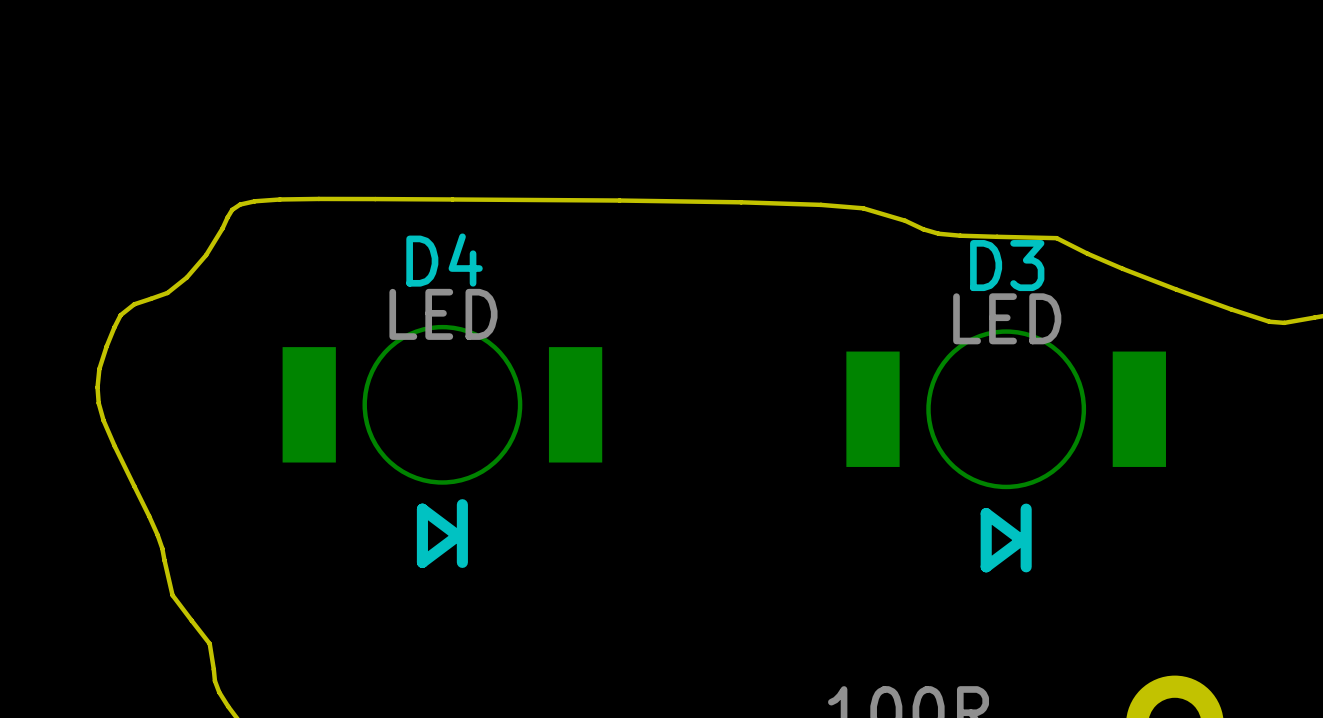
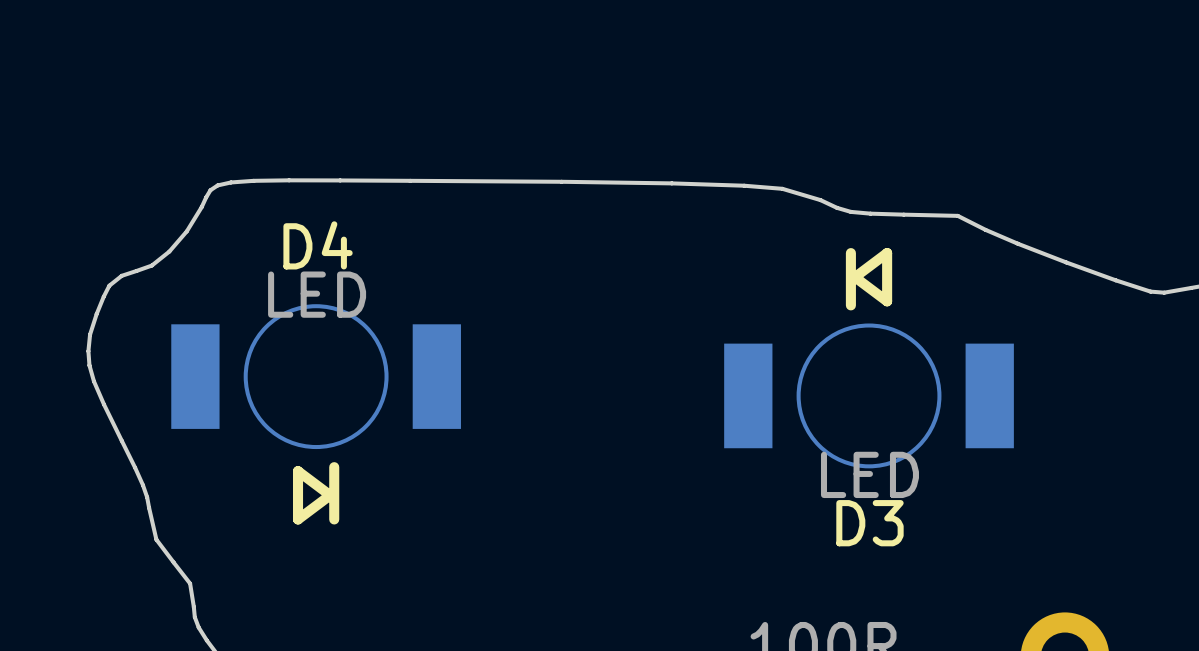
D4 position: (442, 446) -> (316, 414)
D3 rotation: 0° (1006, 450) -> 180° (869, 358)

